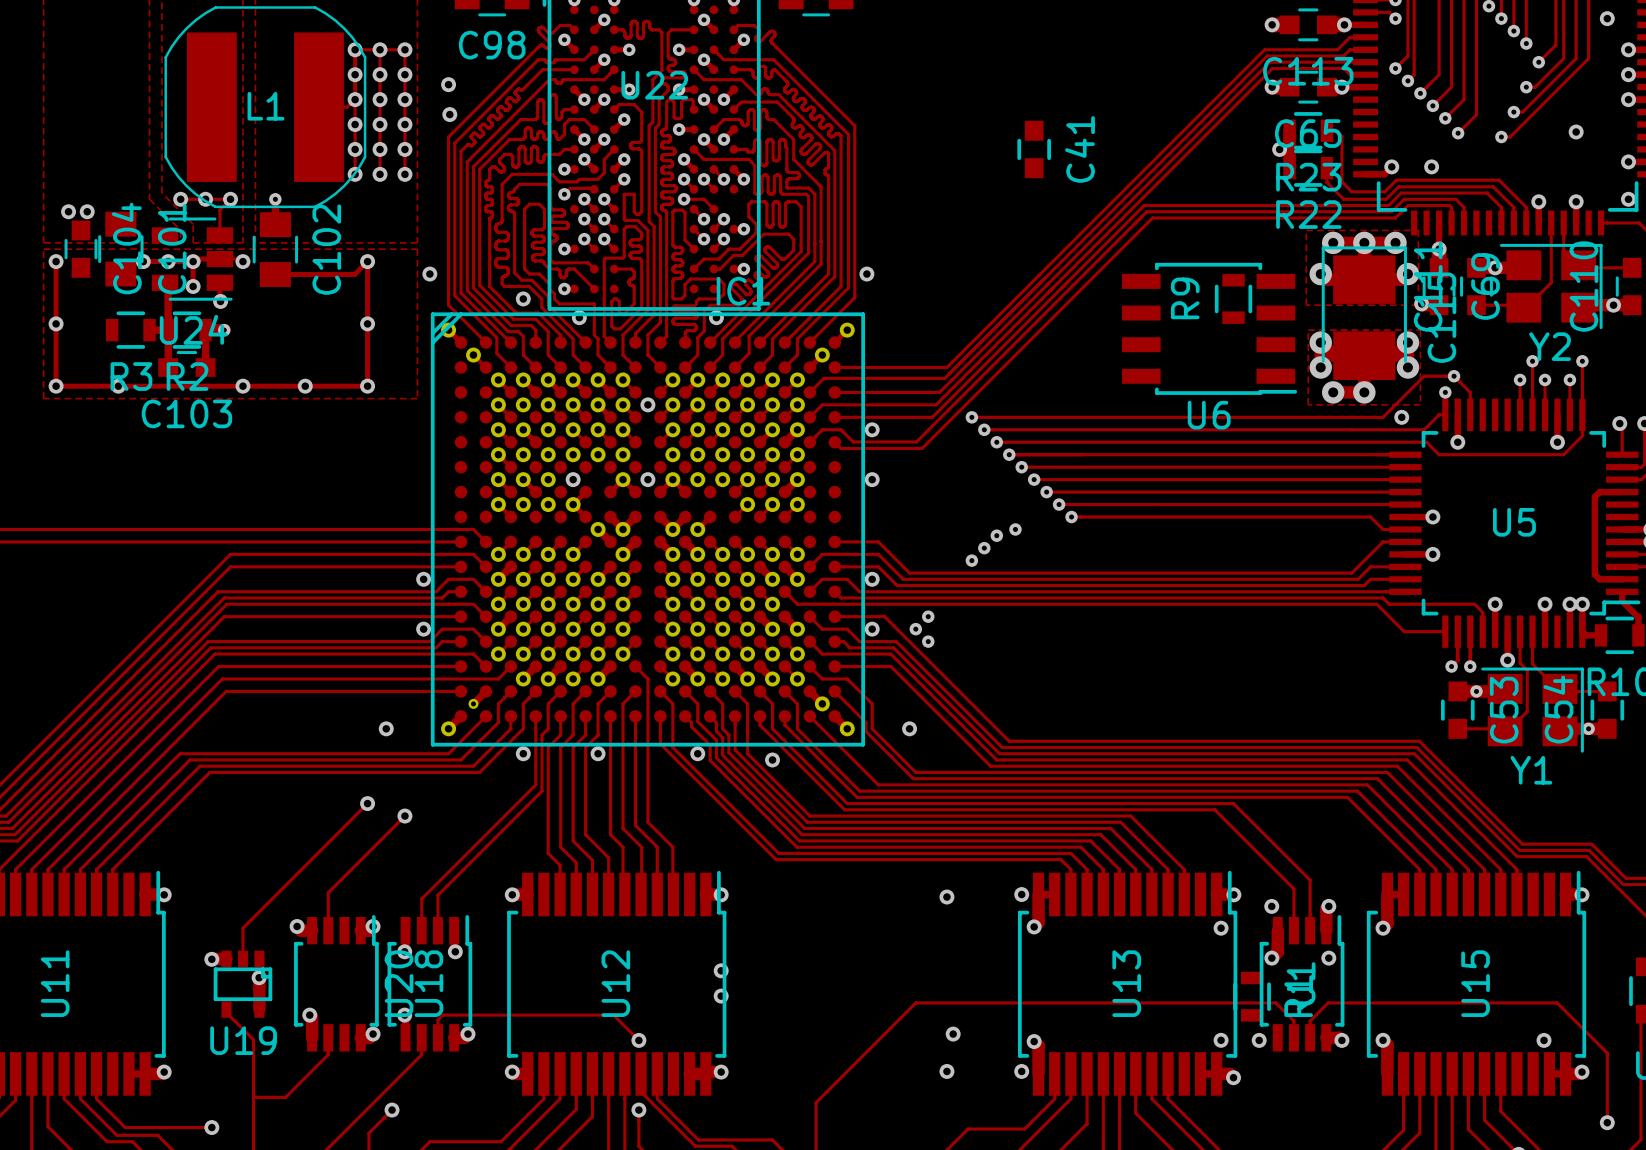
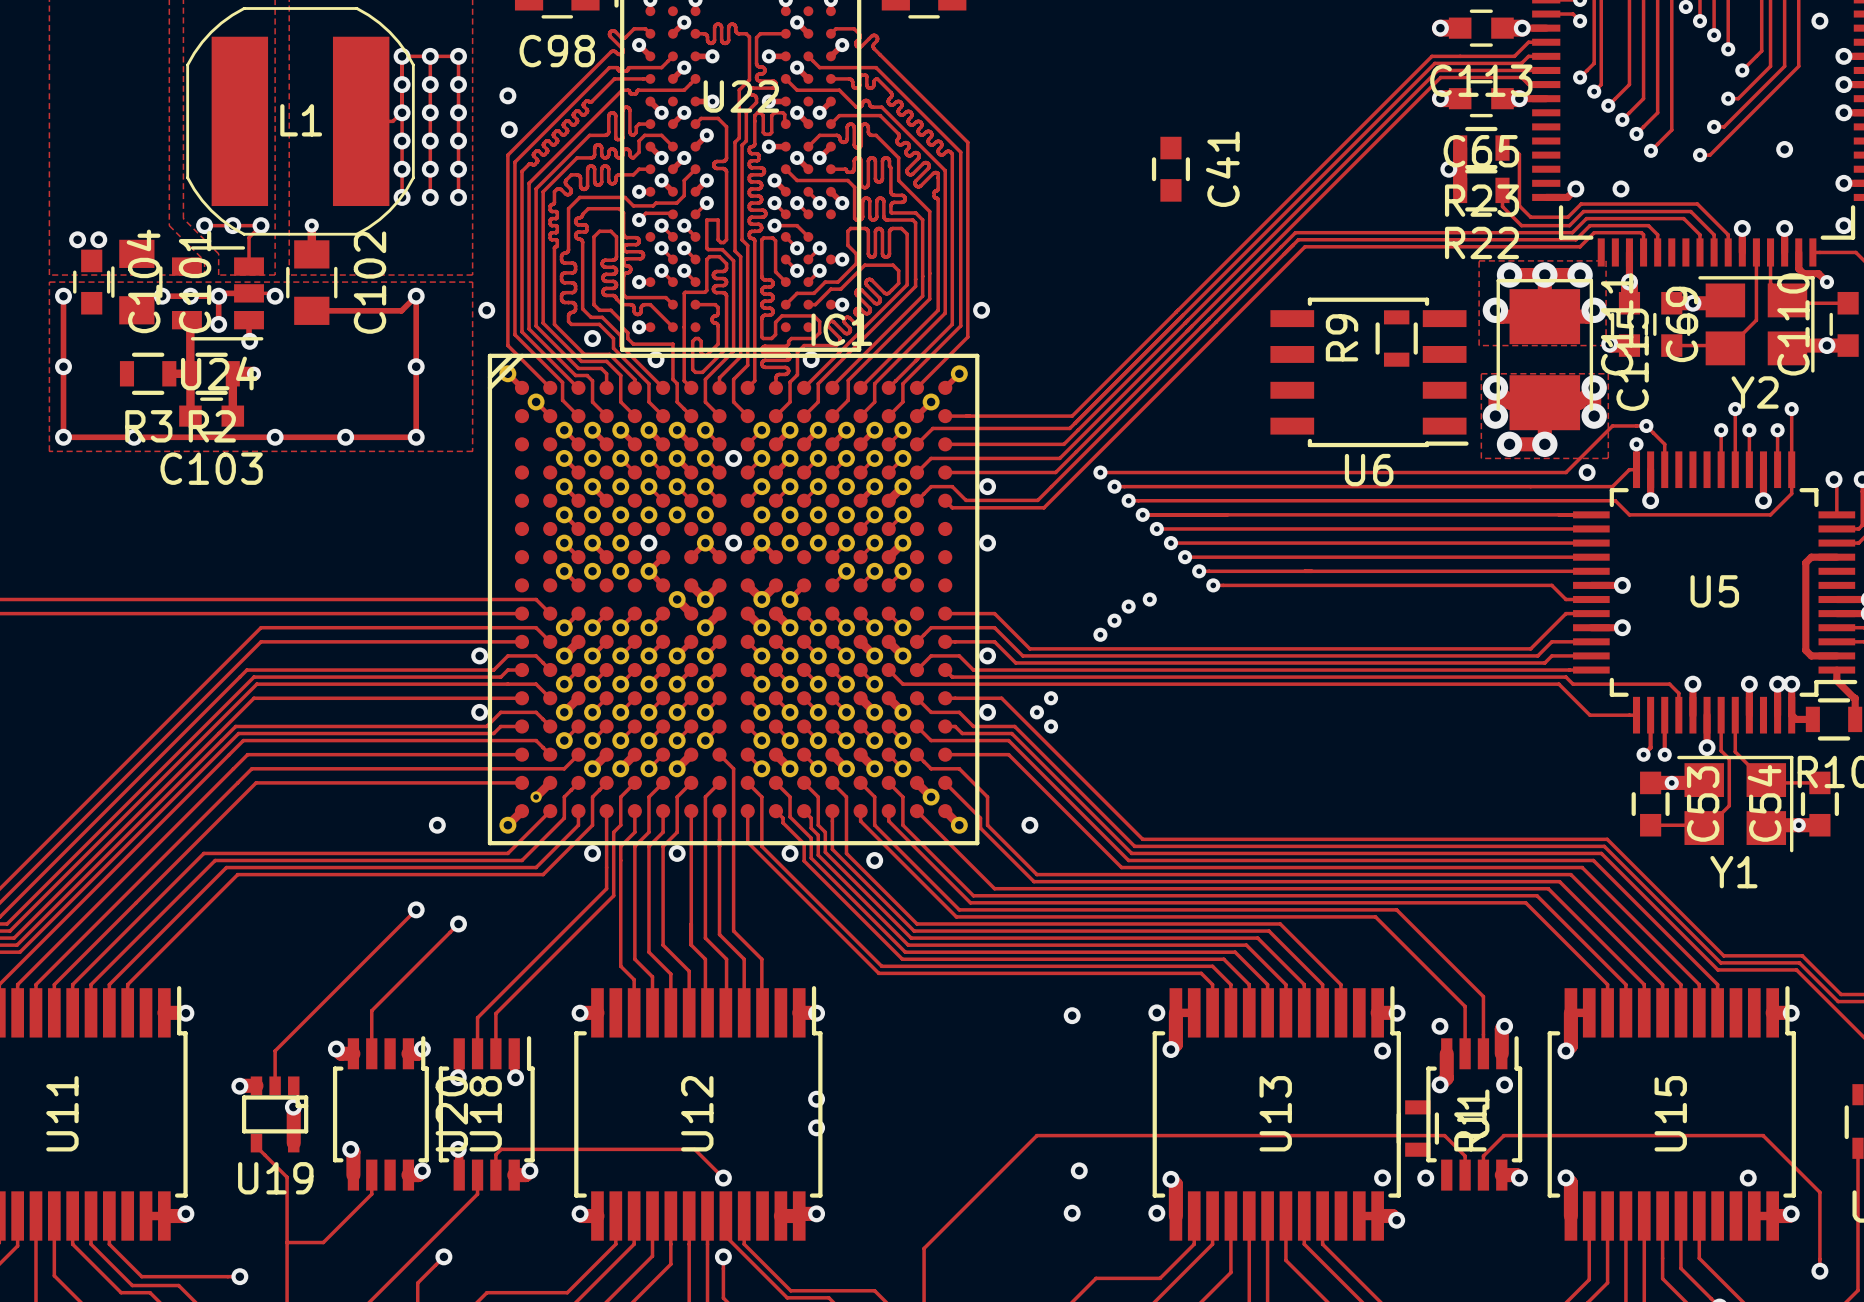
track: none -> (1798, 252) (1798, 268) (1803, 273) (1818, 273) (1826, 282)
via: none -> (1826, 282)

